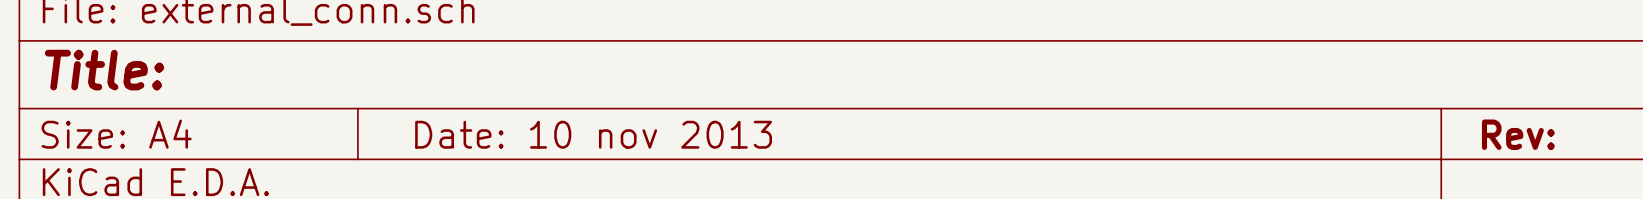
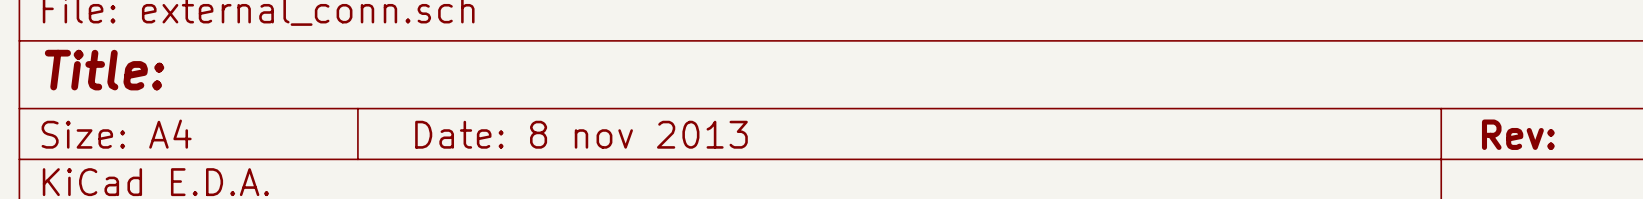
title block: Date: 10 nov 2013 (593, 134) -> Date: 8 nov 2013 (581, 134)

